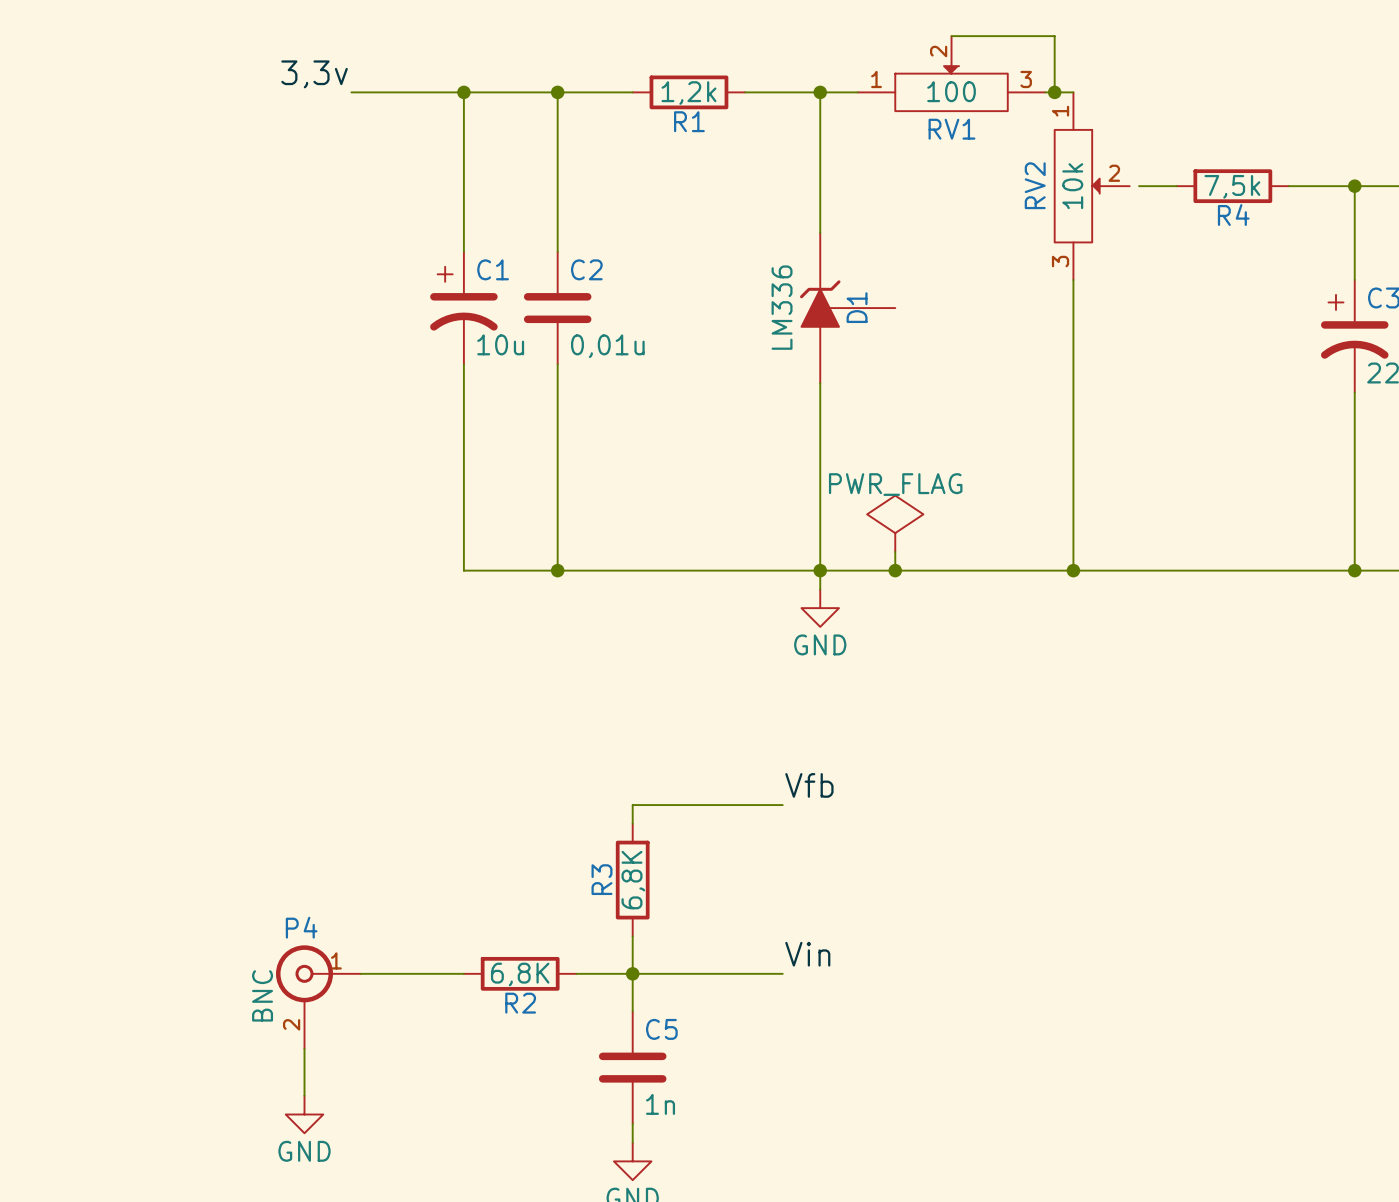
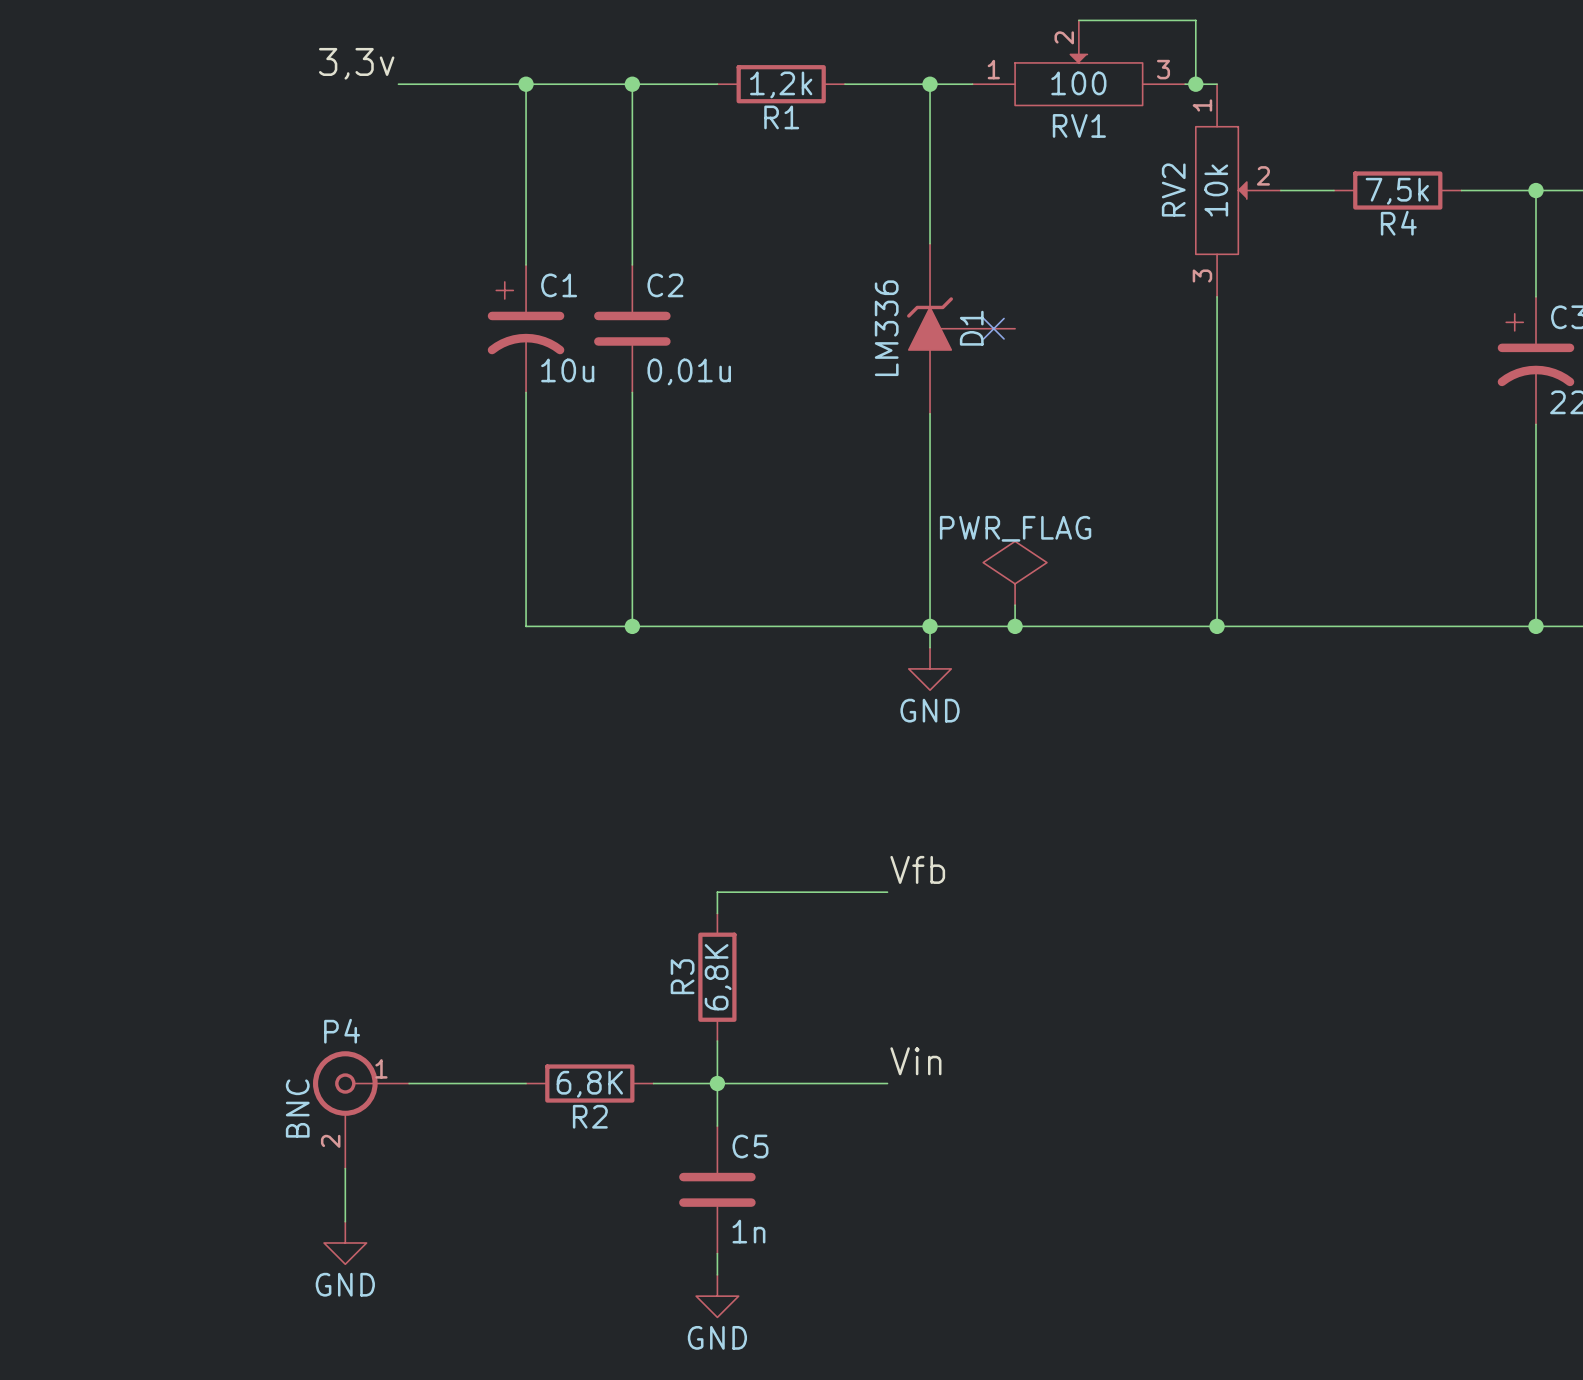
wire: none -> (1280, 190) (1291, 190)
no-connect mark: none -> (993, 328)

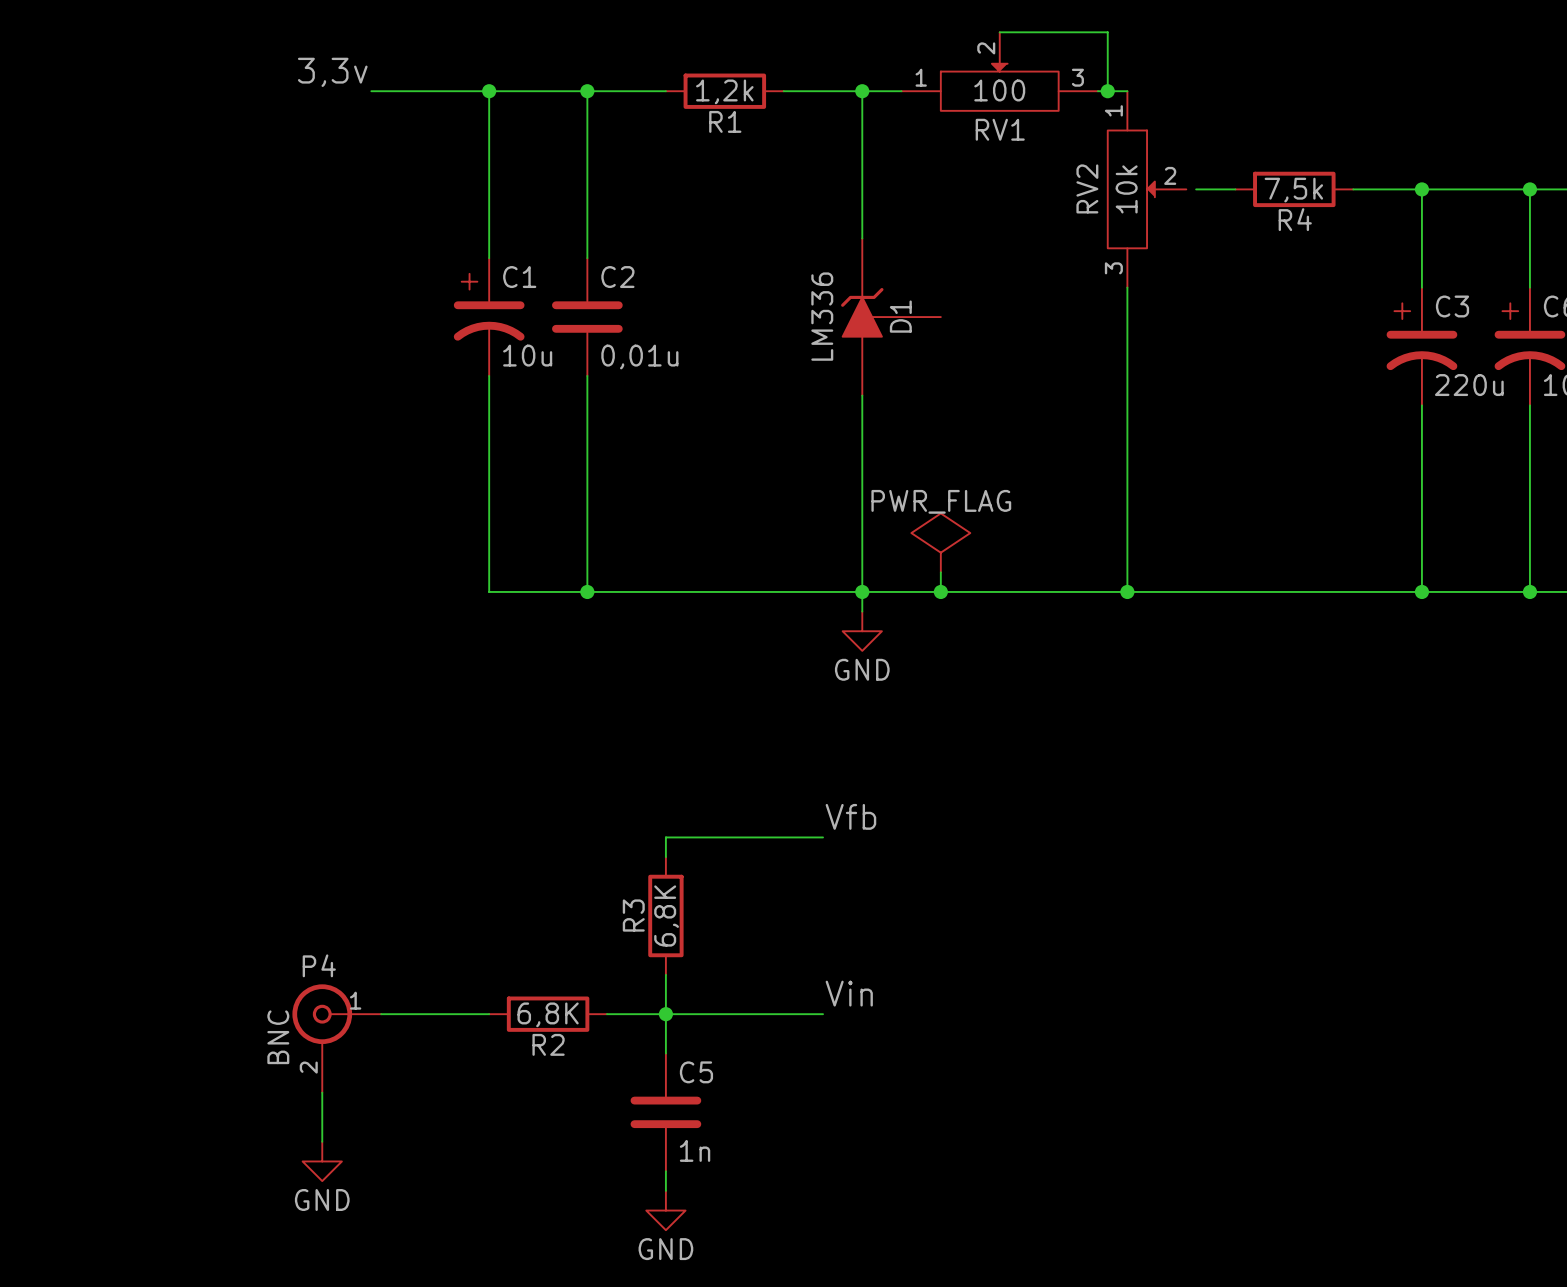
wire: (1280, 190) (1291, 190) -> none
no-connect mark: (993, 328) -> none

